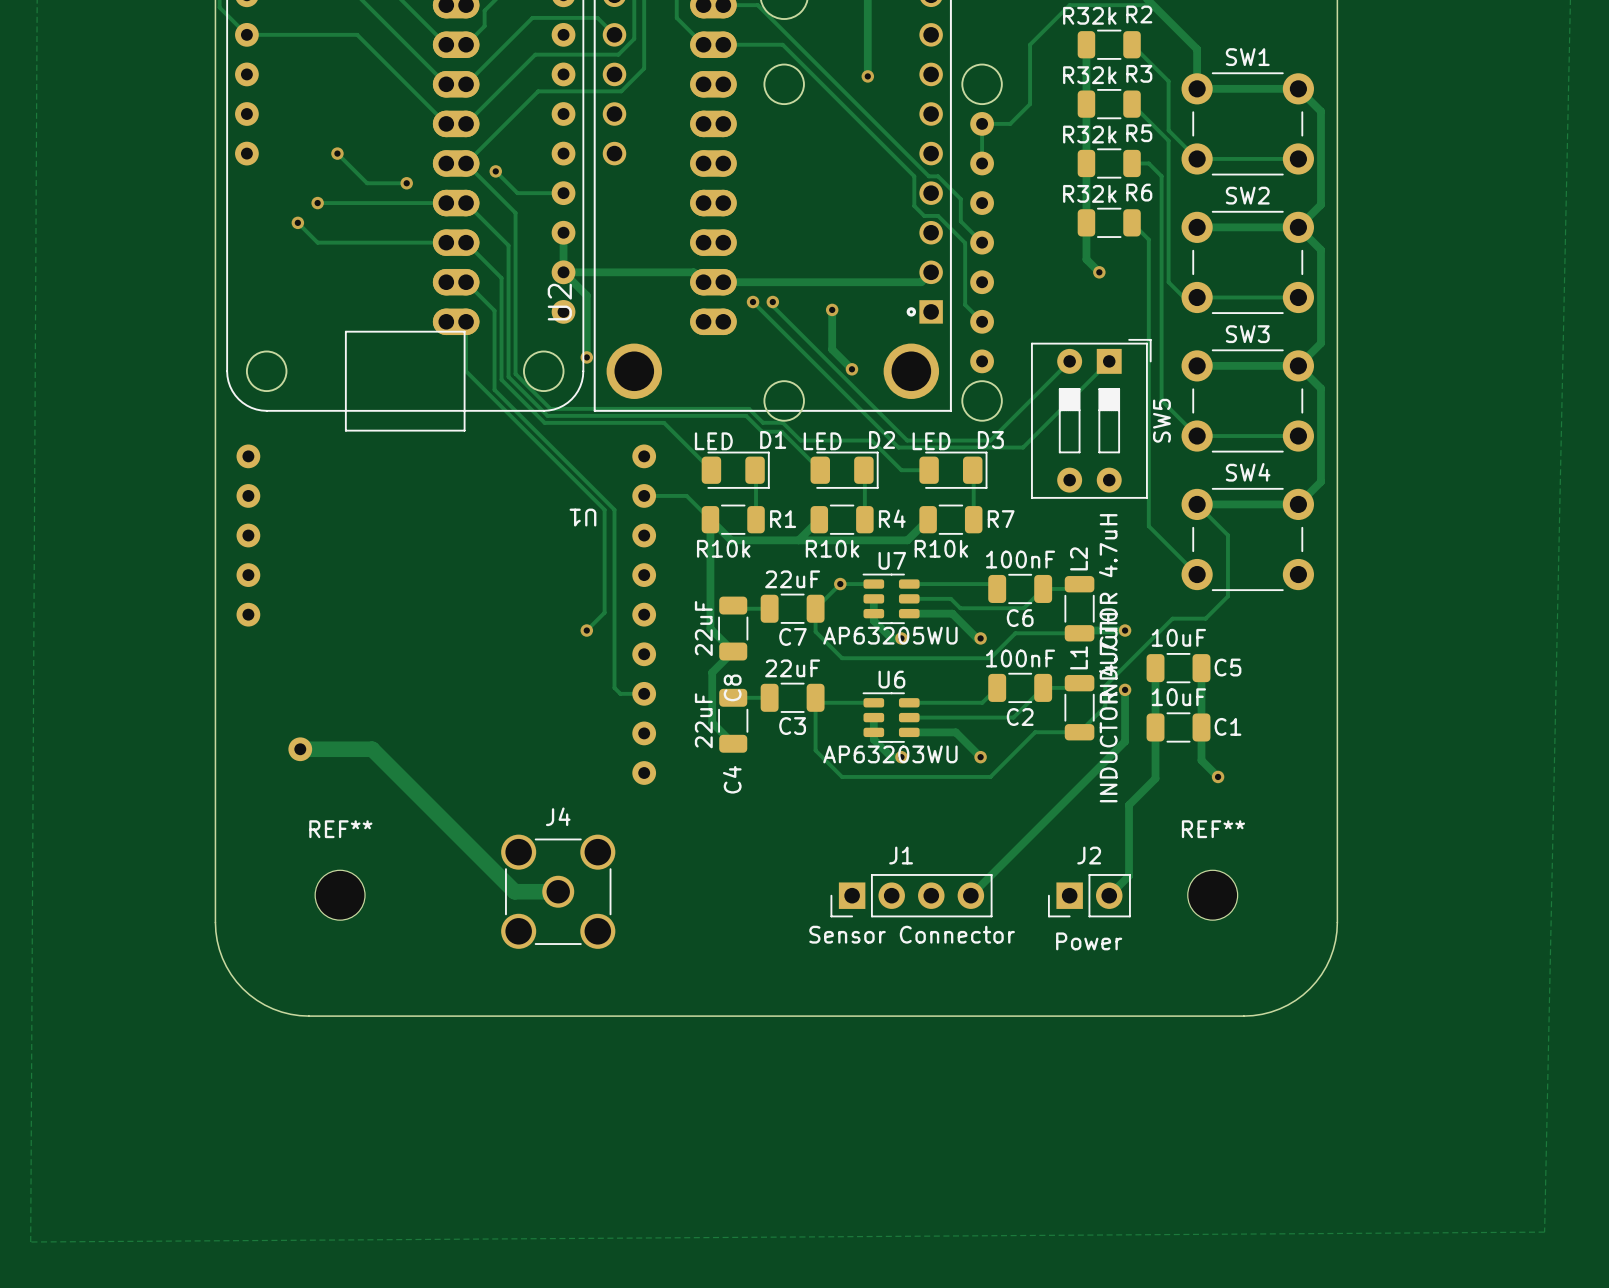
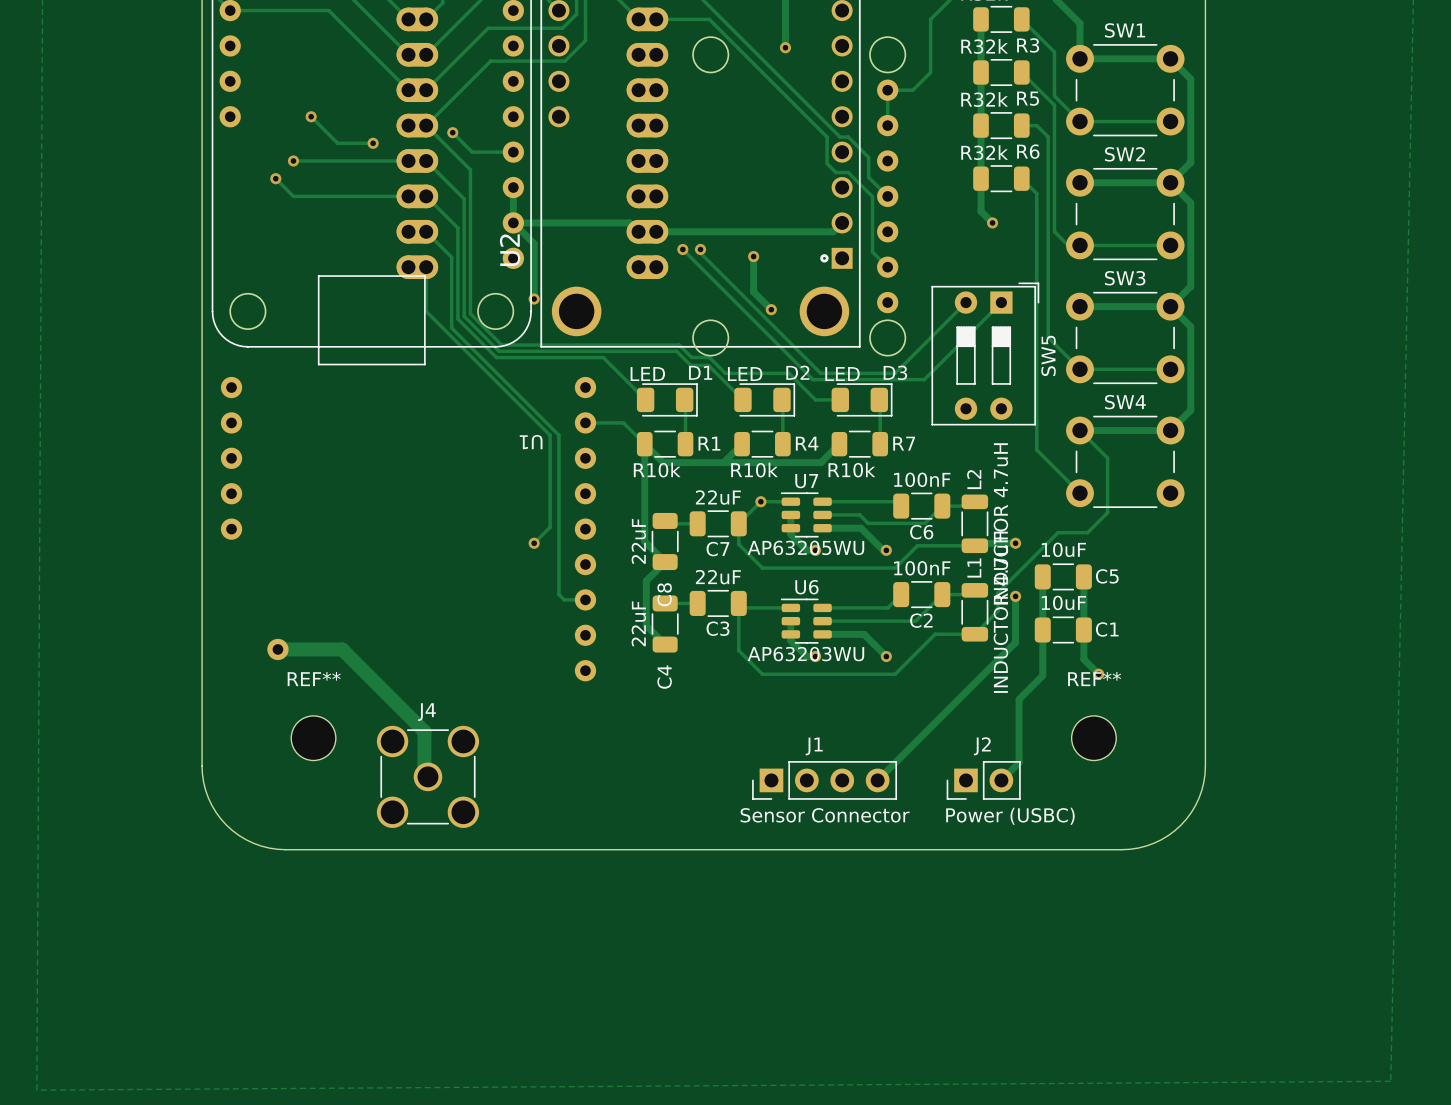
track: (464, 841) (514, 891) (558, 891) -> (424, 731) (424, 773) (427, 776)
board edge: (215, 879) (217, 940) (222, 958) (231, 974) (242, 988) (264, 1005) (281, 1012) (308, 1016) (1253, 1015) (1279, 1008) (1295, 1000) (1309, 988) (1321, 974) (1330, 958) (1335, 940) (1337, 879) -> (202, 766) (203, 782) (208, 798) (216, 812) (226, 825) (239, 835) (253, 843) (269, 848) (285, 849) (1130, 849) (1146, 846) (1161, 839) (1174, 830) (1186, 819) (1199, 798) (1203, 782) (1205, 766)
J4 position: (558, 891) -> (427, 776)
REF** position: (340, 895) -> (313, 738)
REF** position: (1212, 895) -> (1093, 738)
J2 value: Power (1089, 941) -> Power (USBC) (1010, 816)

